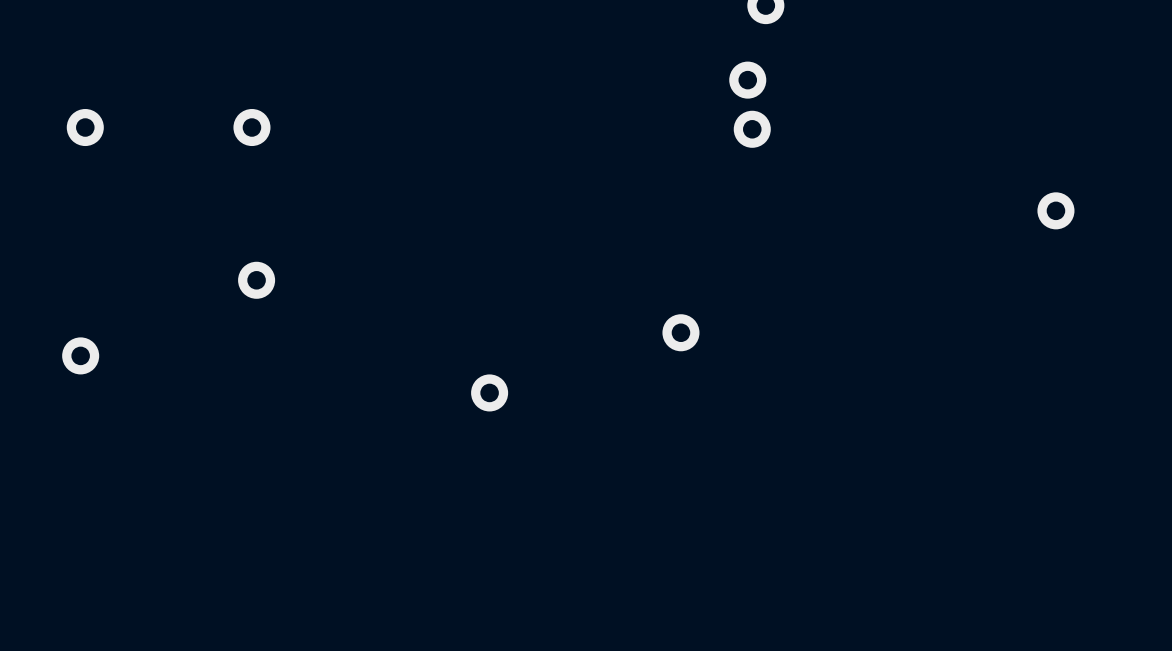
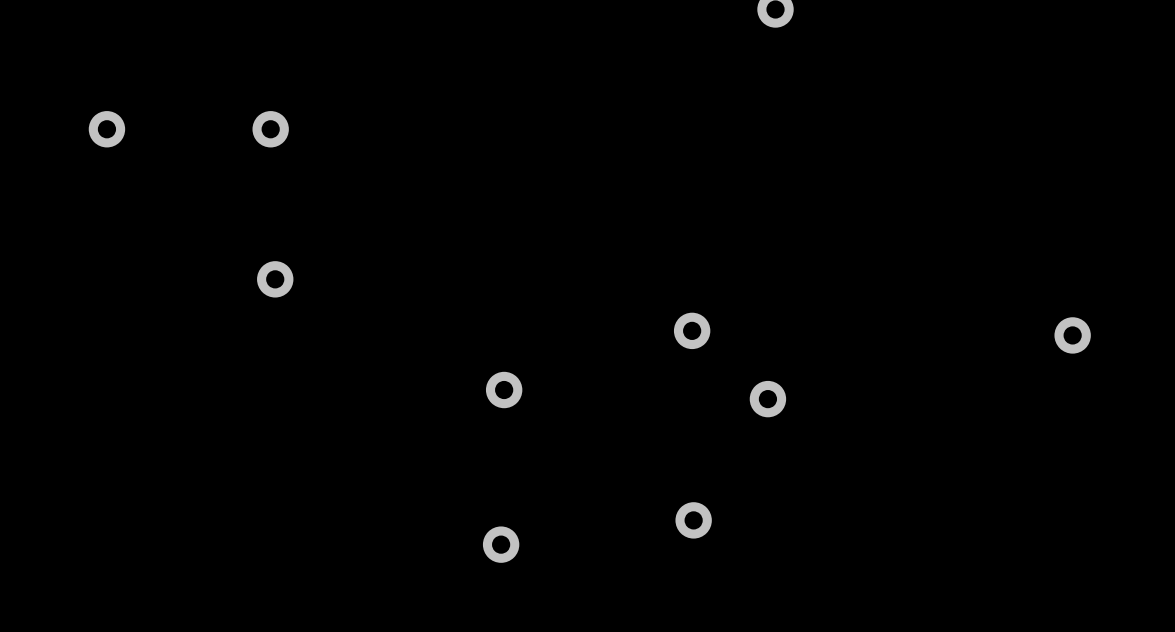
via: (747, 80) -> none
via: (752, 129) -> none
via position: (1055, 210) -> (1072, 335)
via: (80, 355) -> none
via: none -> (767, 399)
via: none -> (693, 520)
via: none -> (501, 544)

